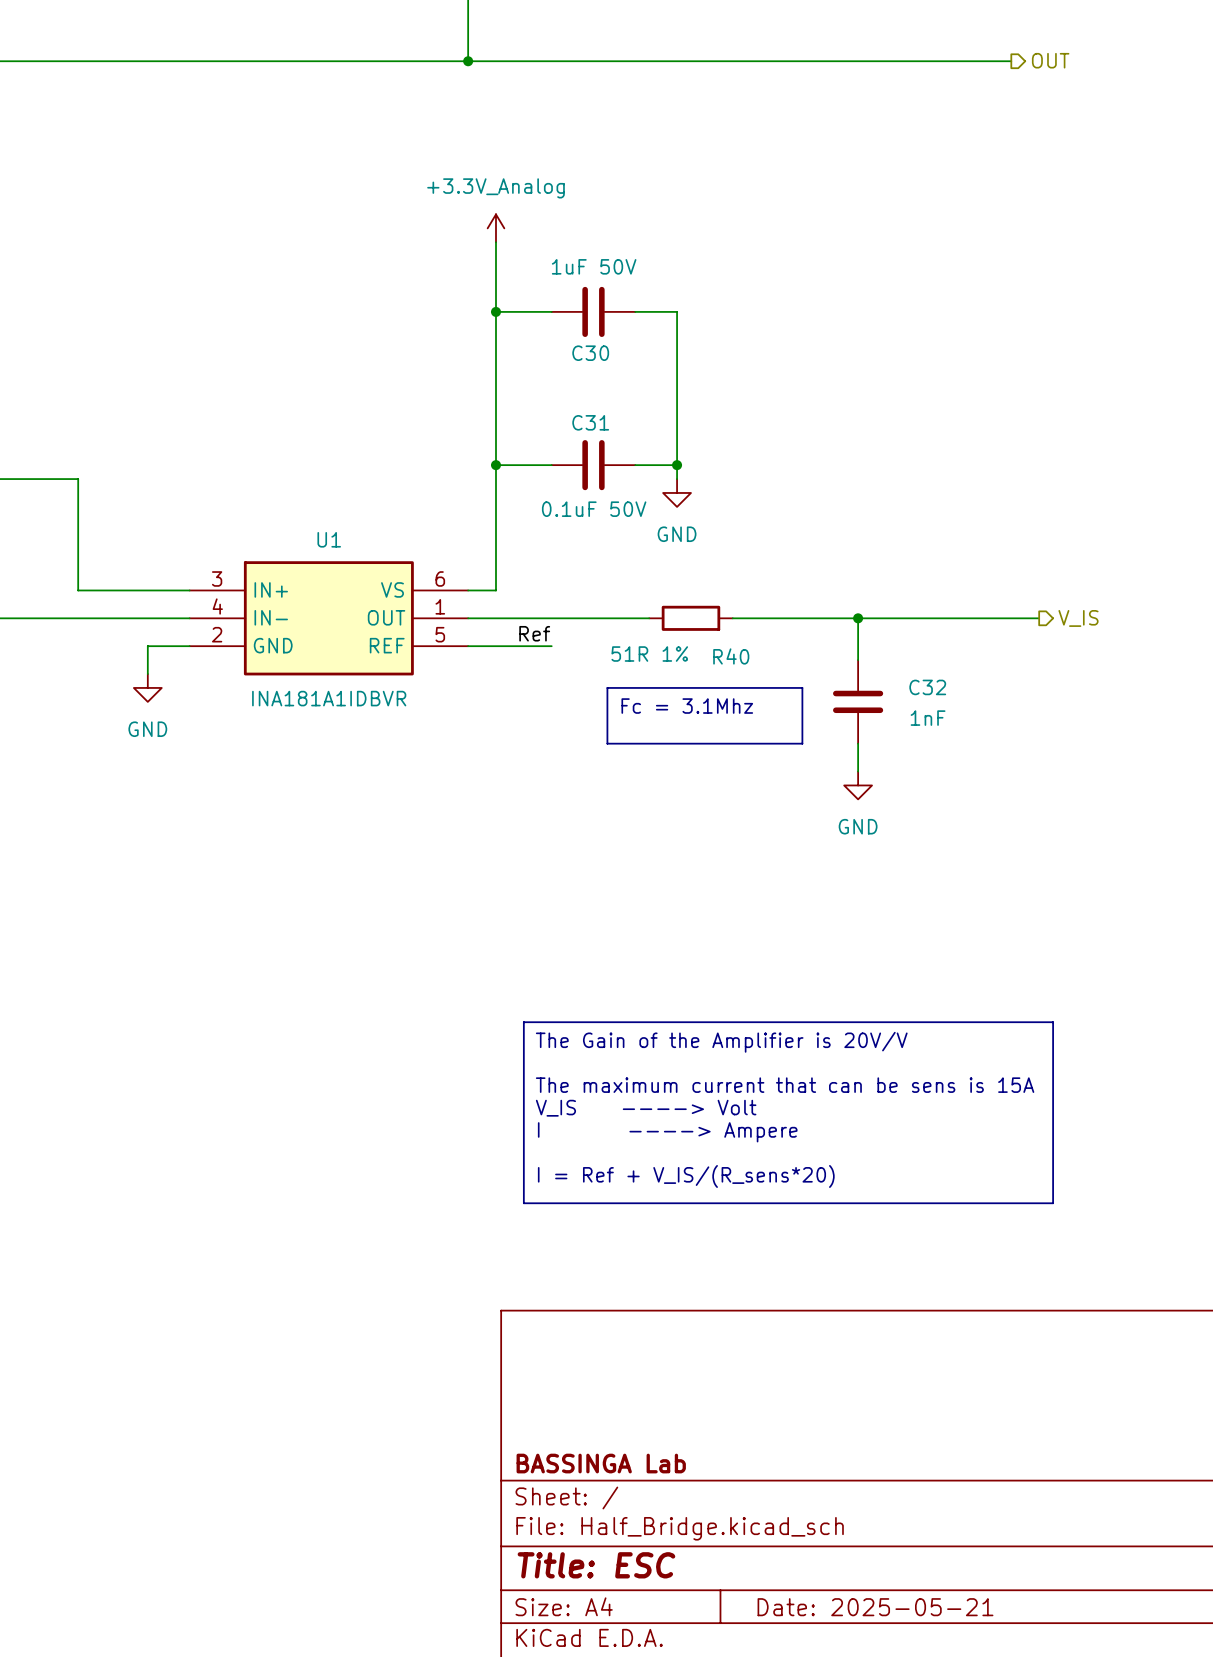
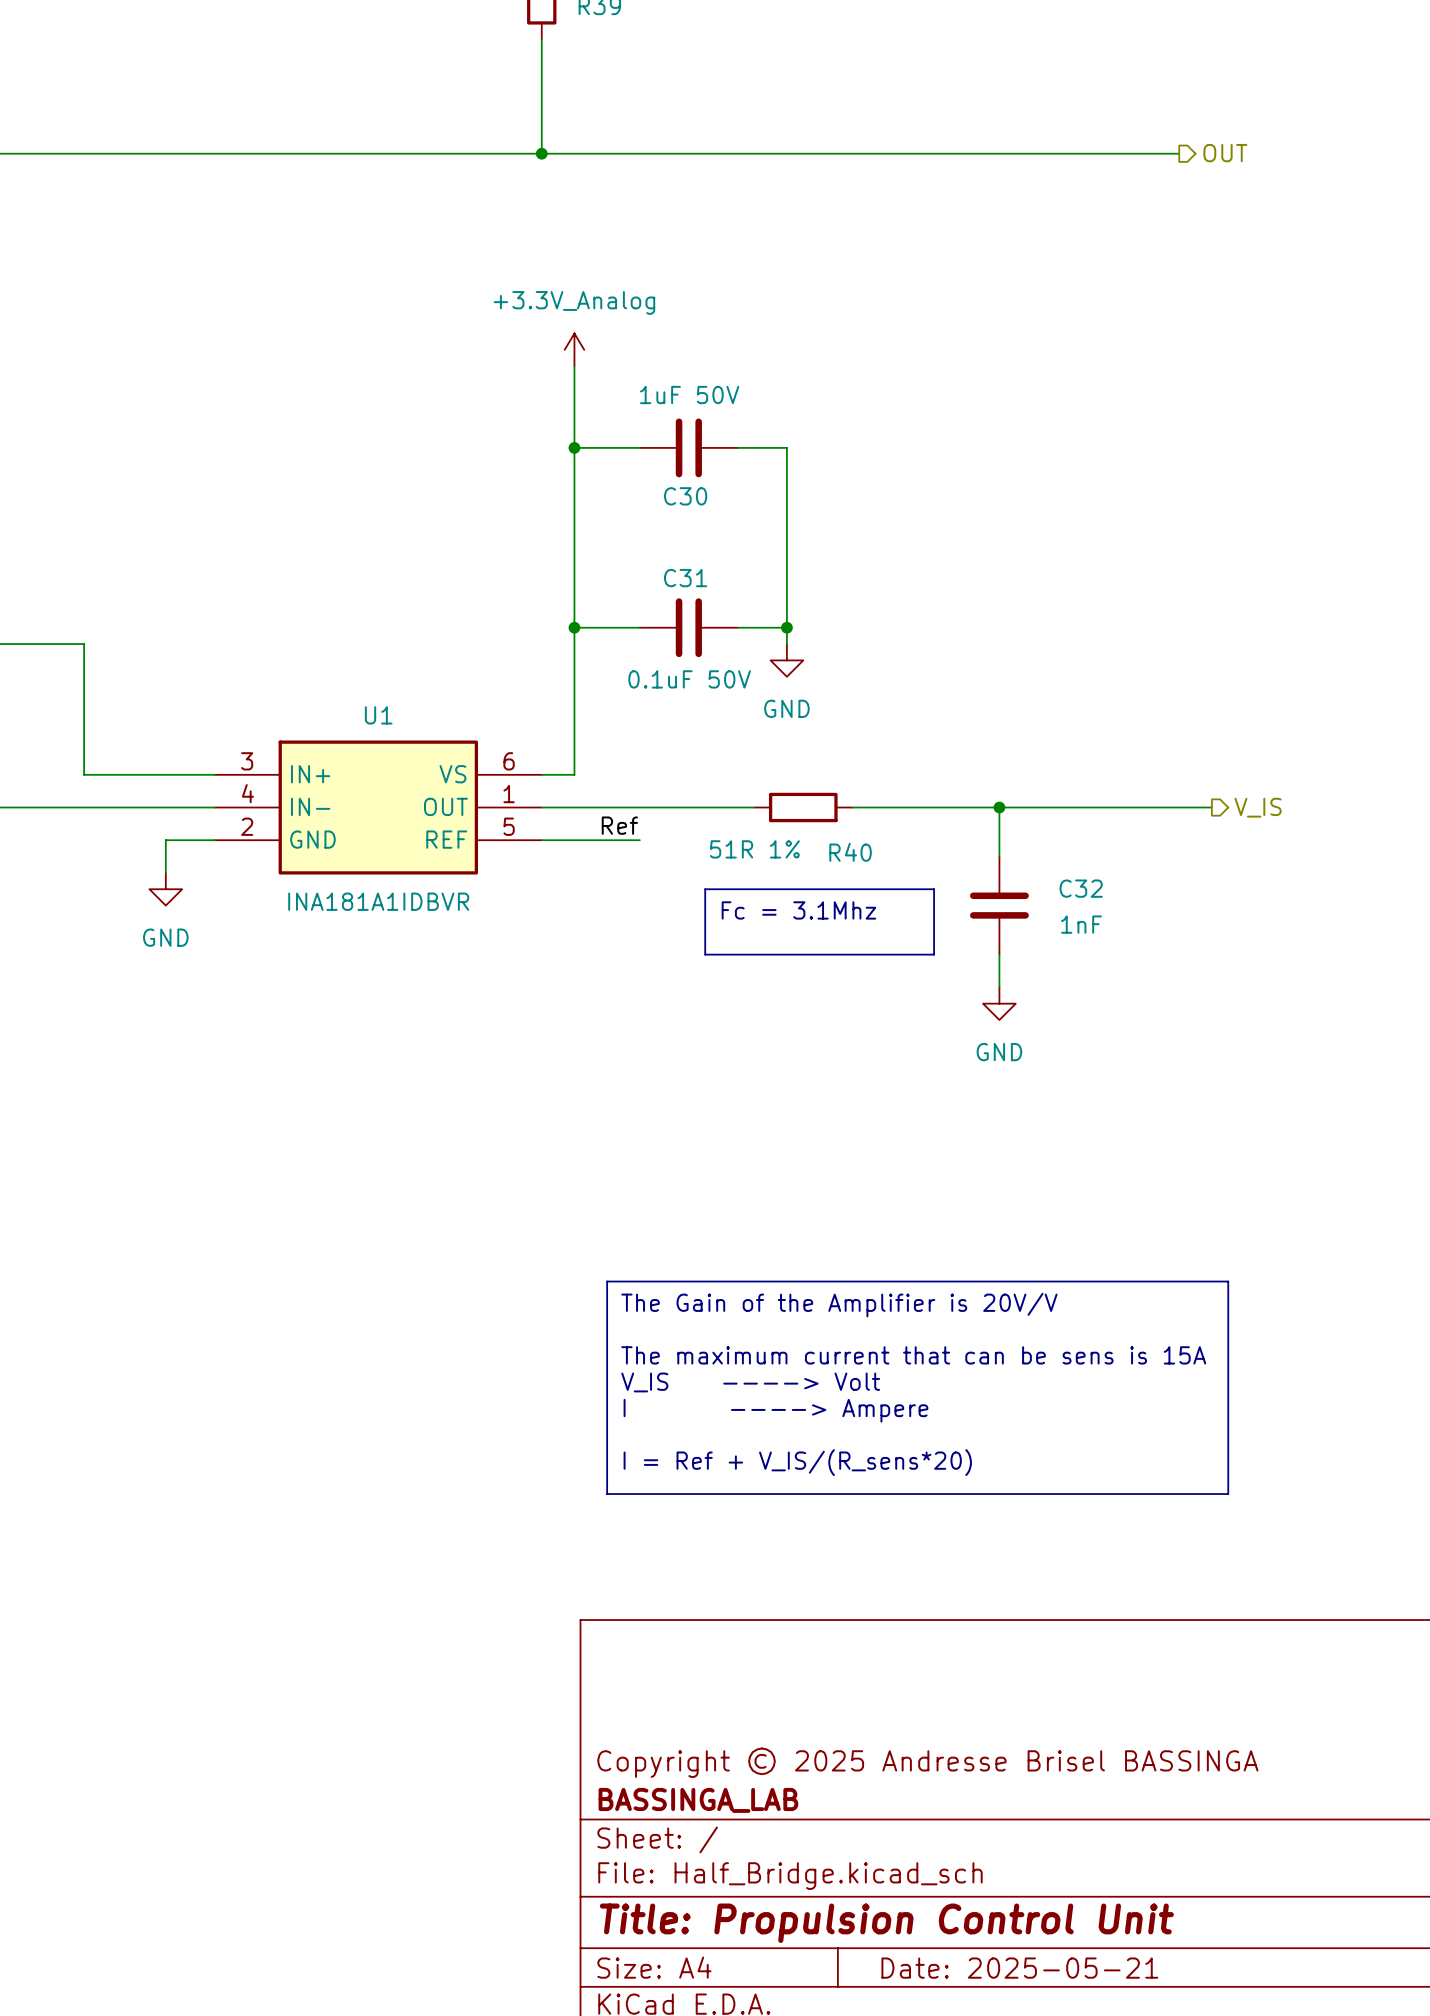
title block: none -> Copyright © 2025 Andresse Brisel BASSINGA (927, 1762)
title block: BASSINGA Lab (601, 1463) -> BASSINGA_LAB (698, 1800)
title block: Title: ESC (596, 1565) -> Title: Propulsion Control Unit (886, 1923)

